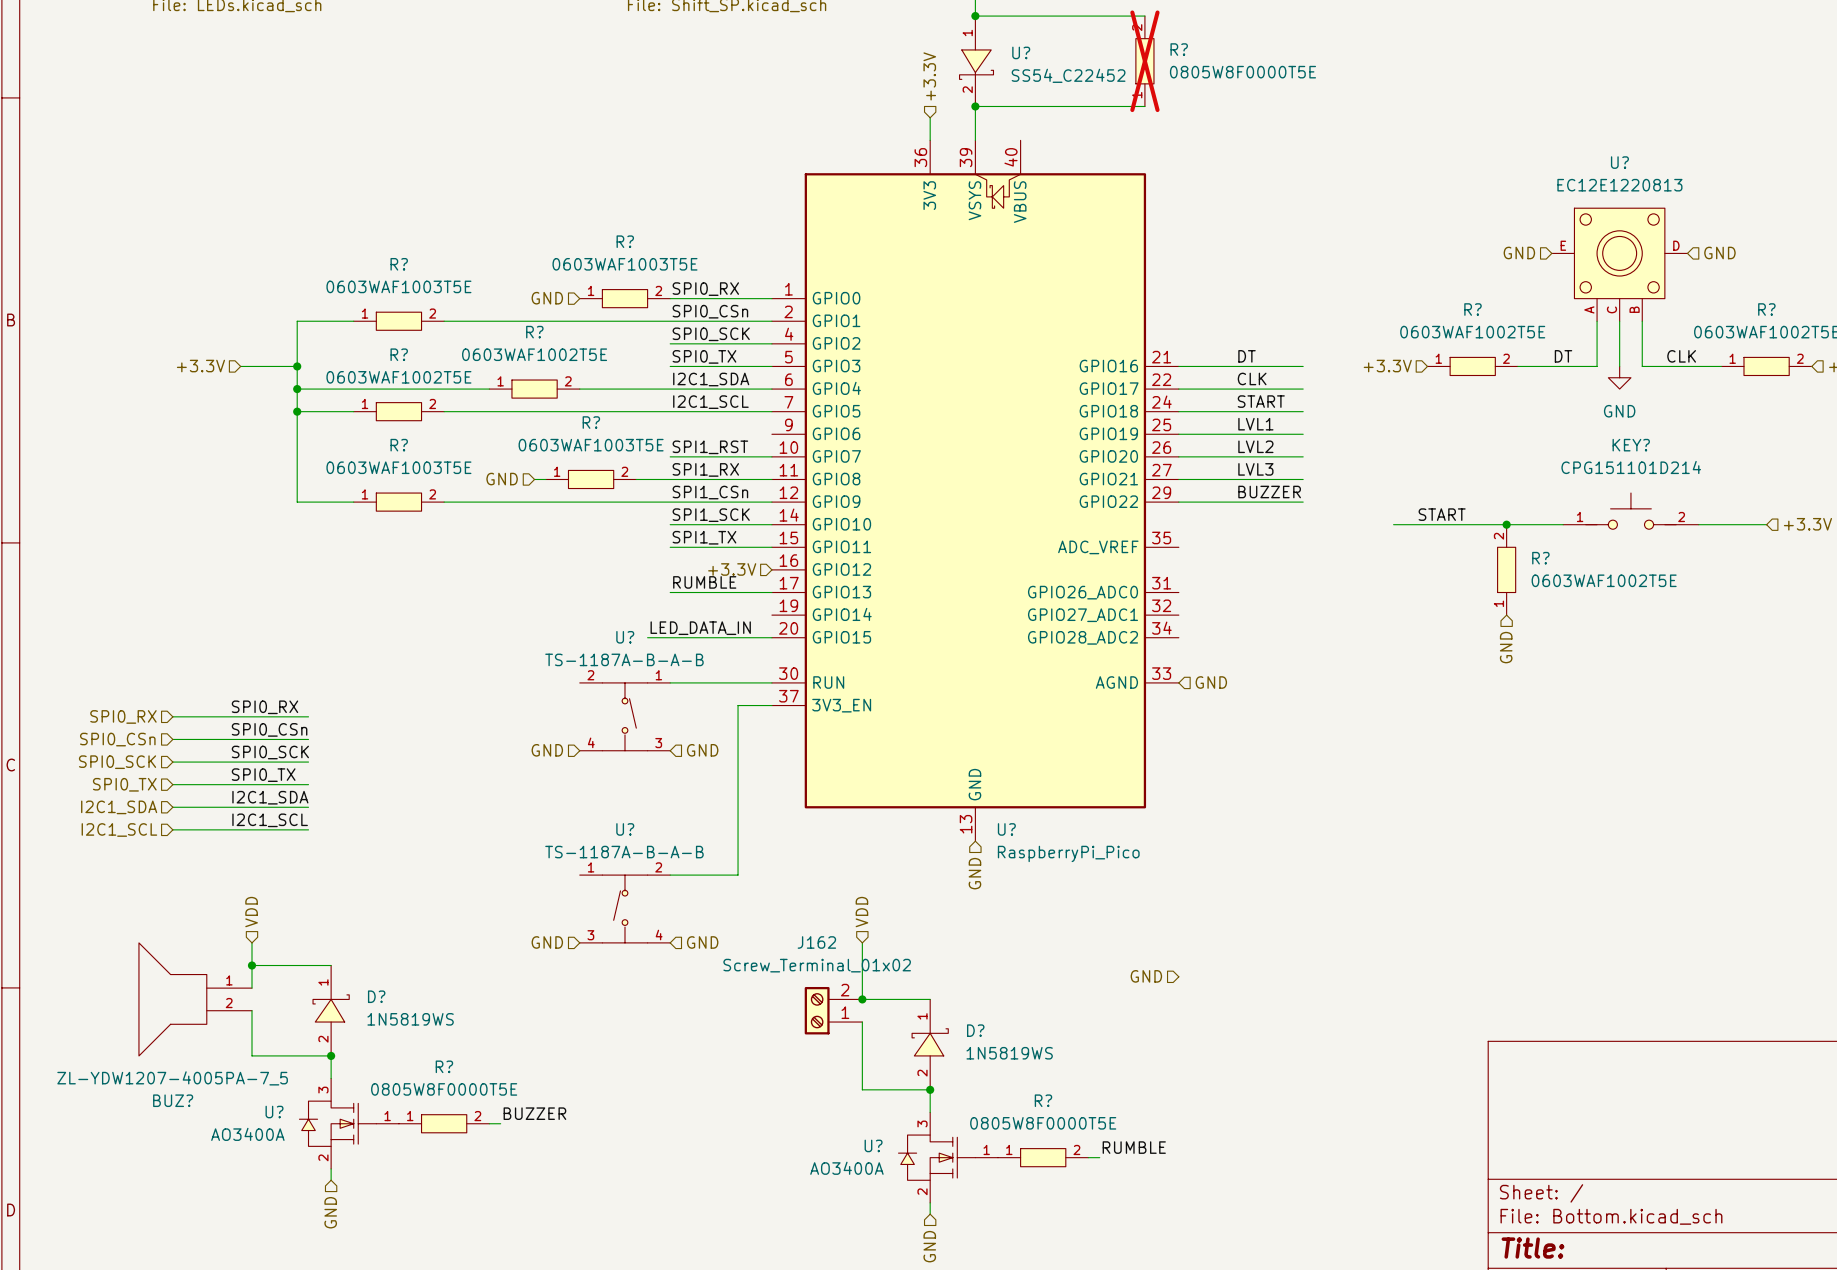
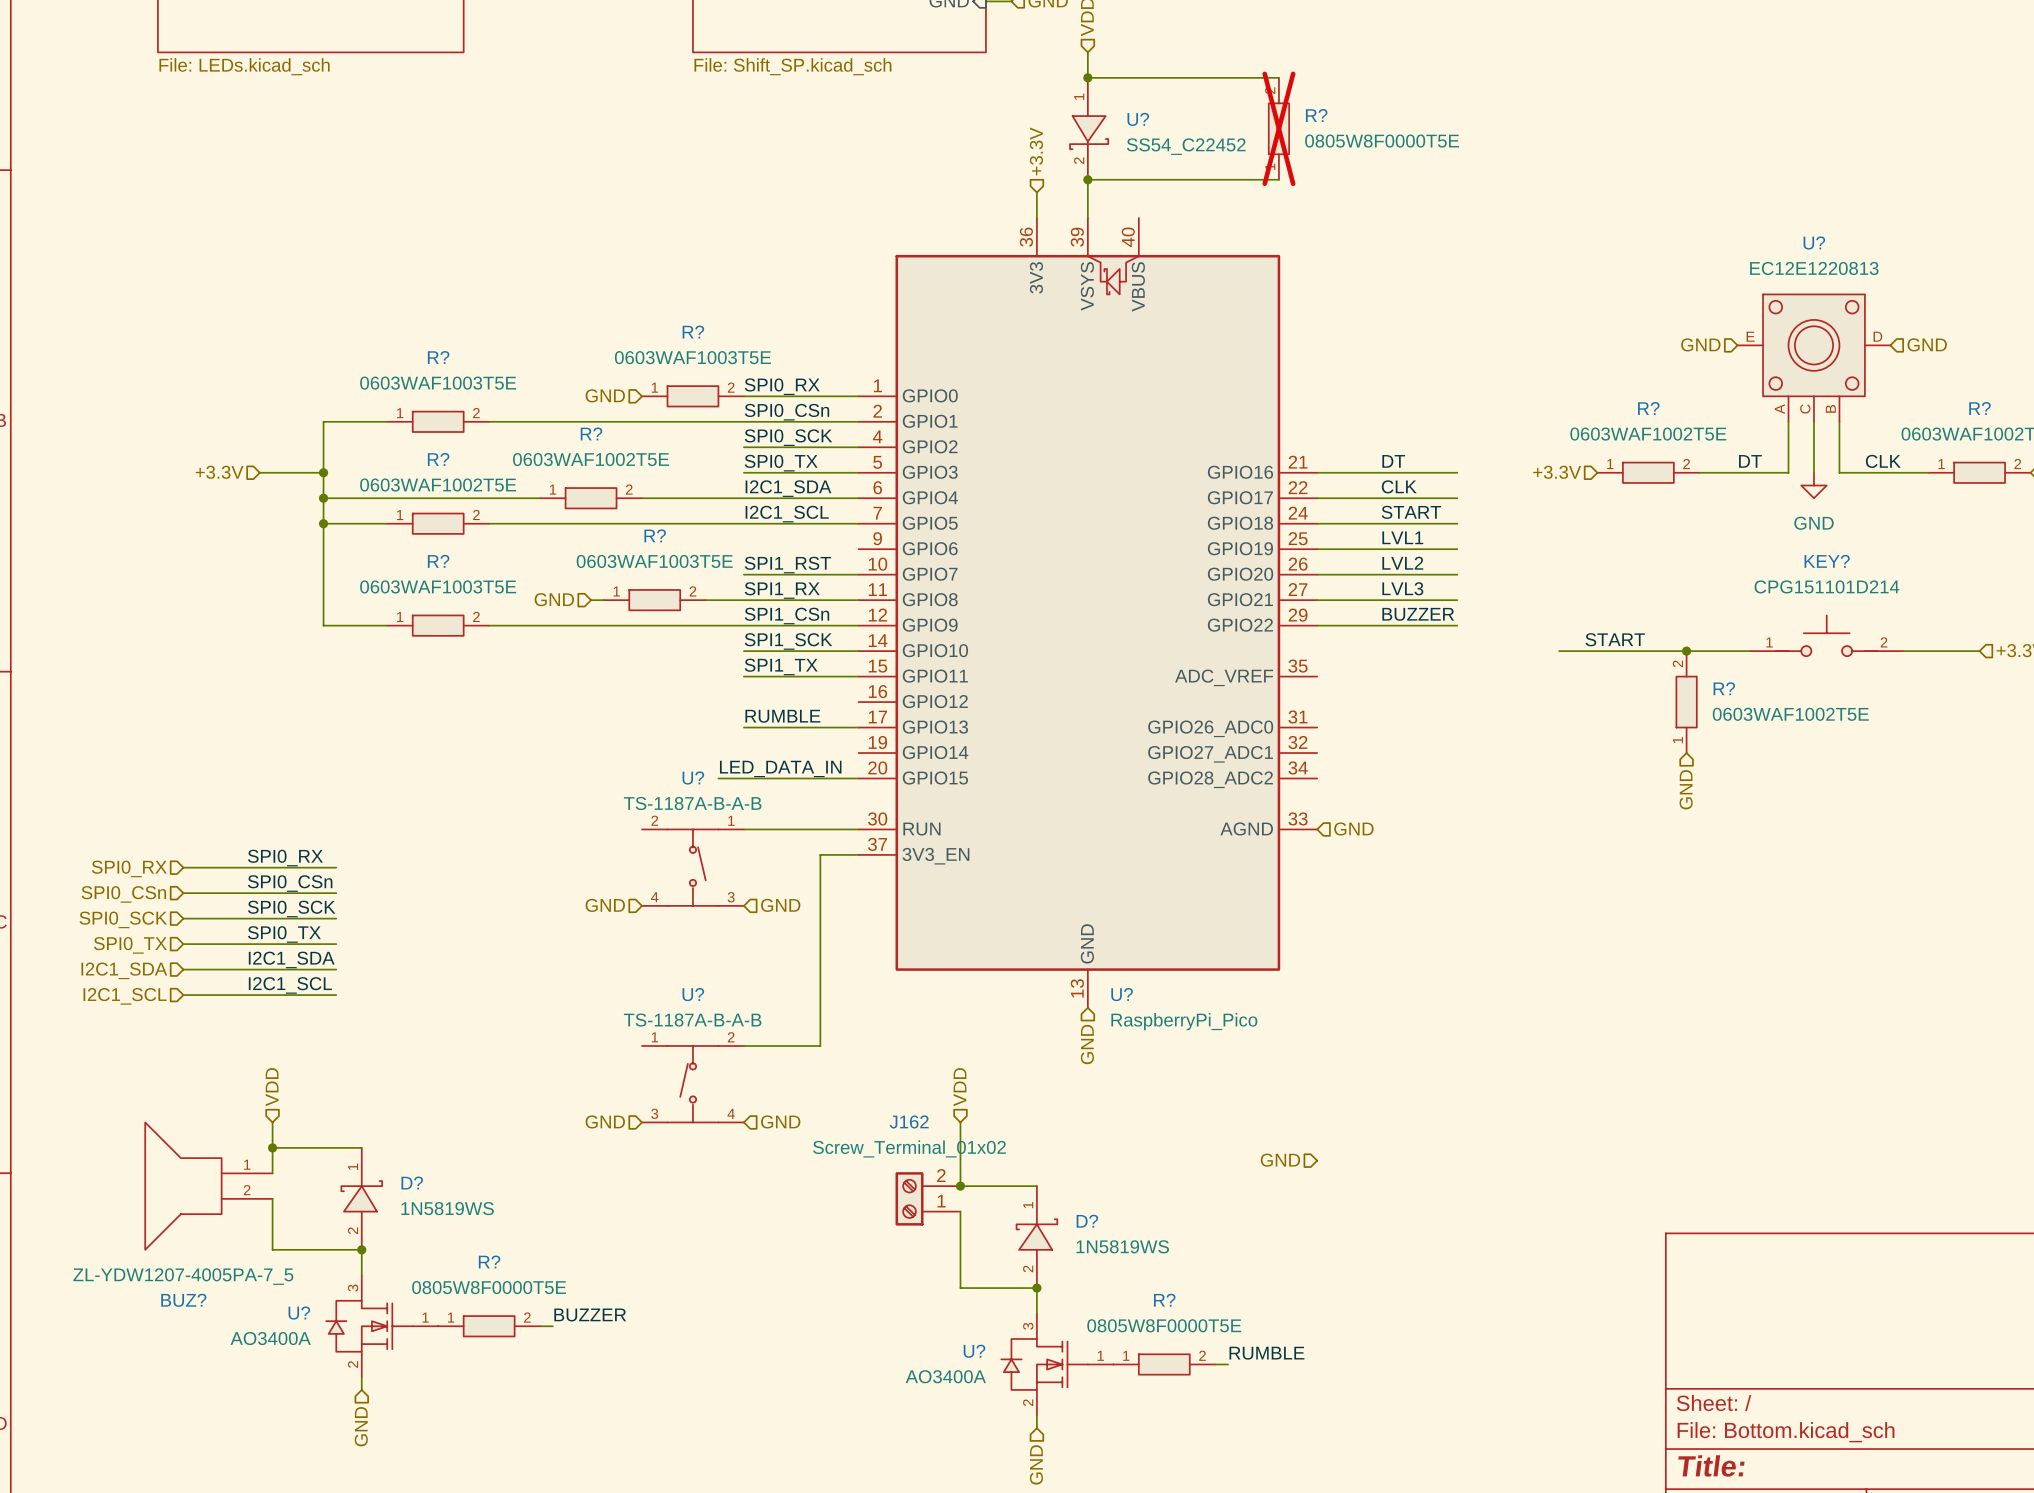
hierarchical label: +3.3V (732, 569) -> none

